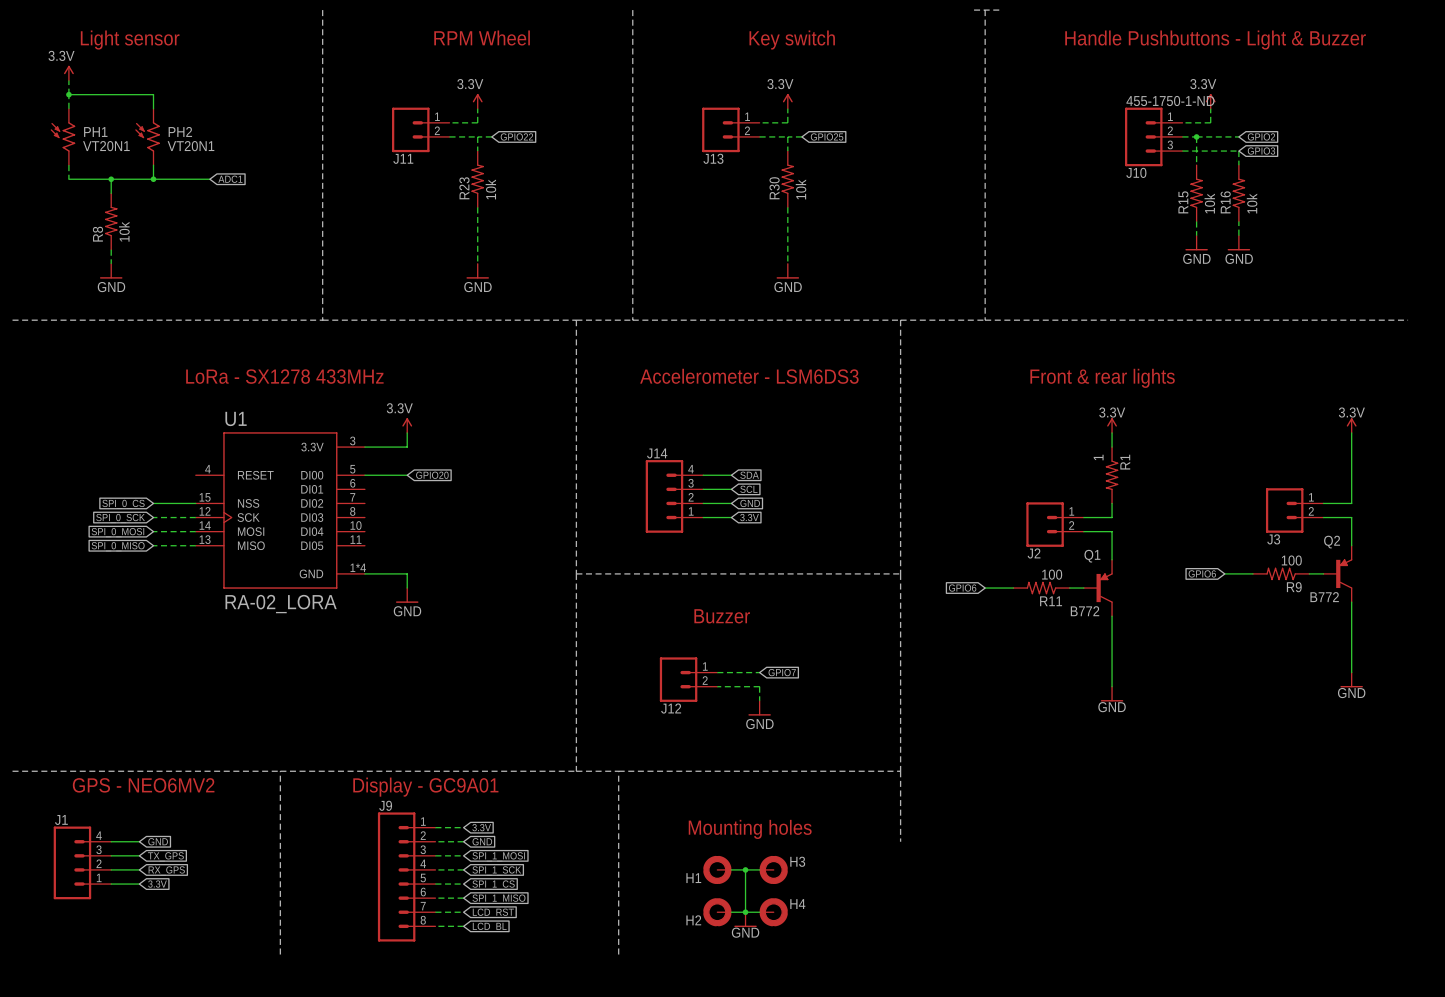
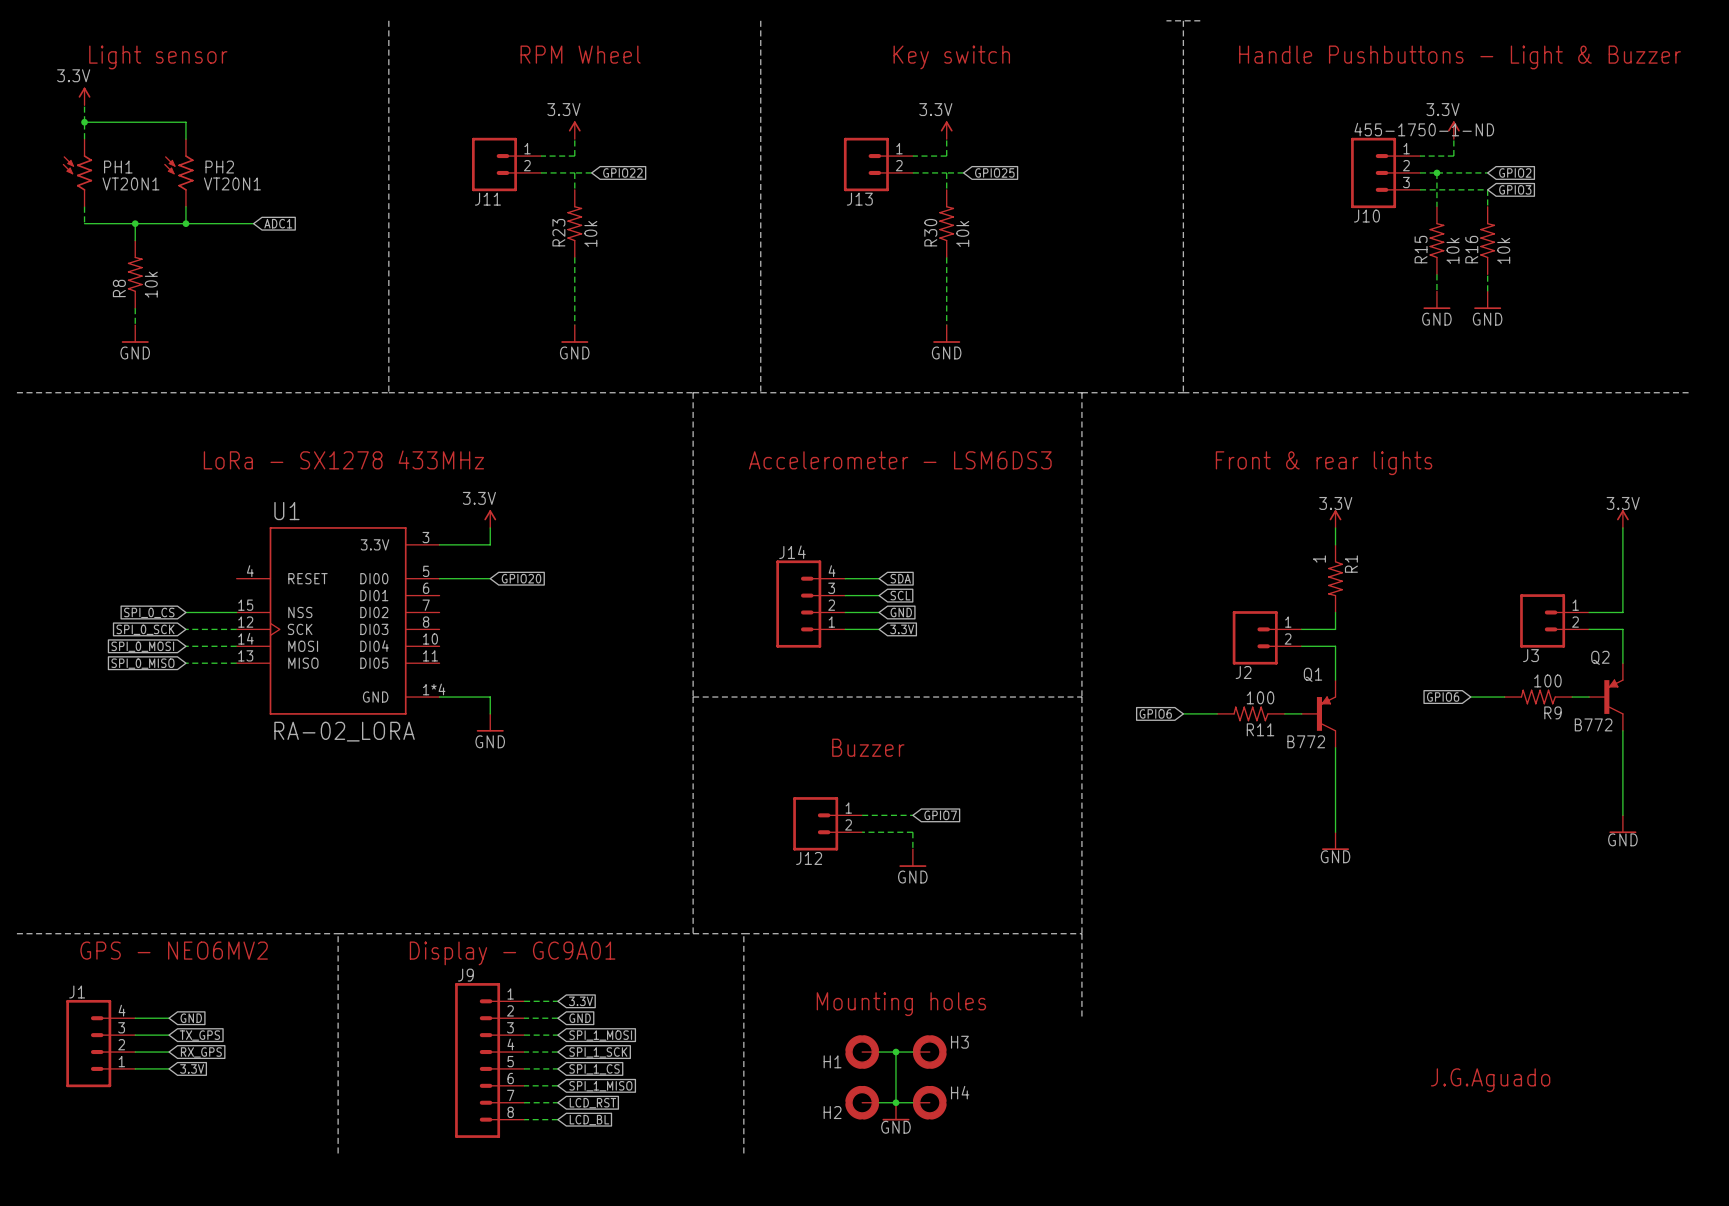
text: none -> J.G.Aguado (1490, 1080)

